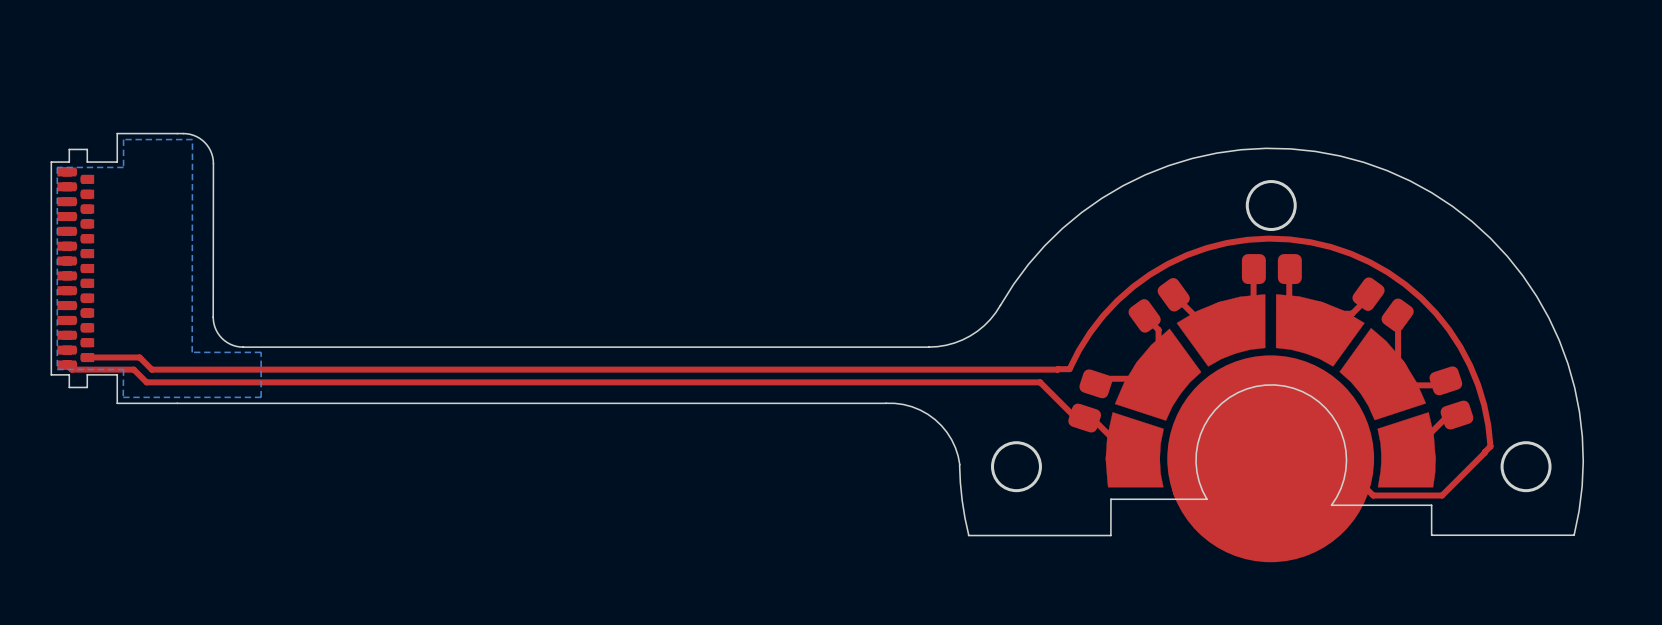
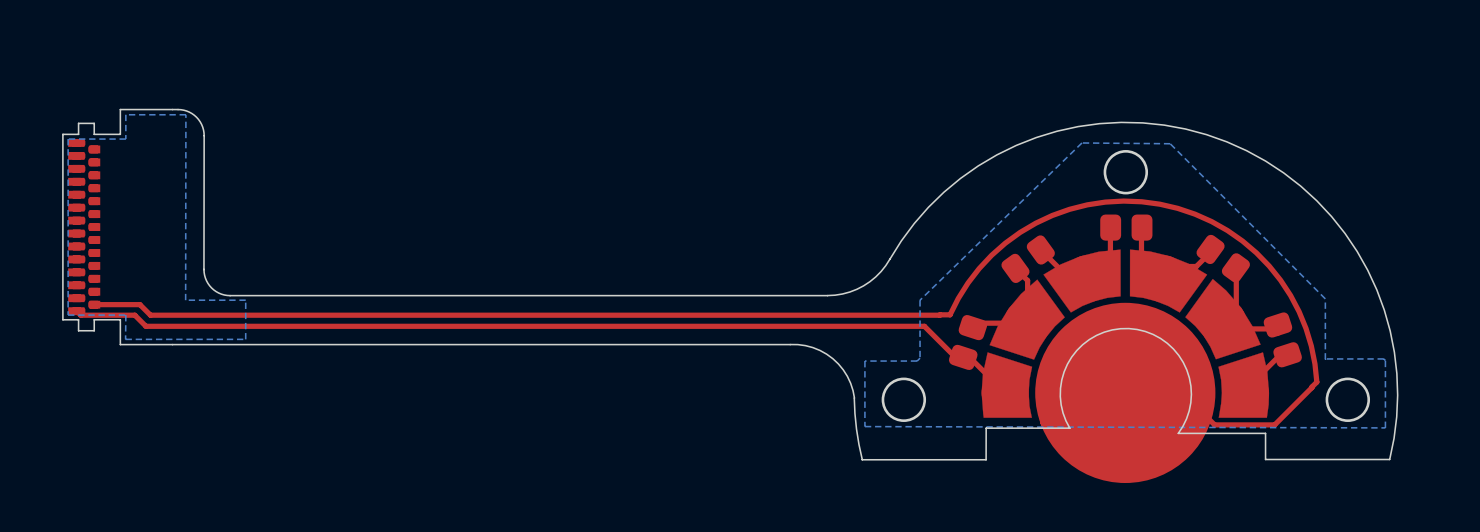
bottom zone outline: none -> (1081, 142) (1170, 143) (1325, 298) (1325, 359) (1383, 358) (1385, 360) (1385, 427) (864, 426) (864, 361) (917, 361) (920, 358) (920, 300) (1081, 142)

